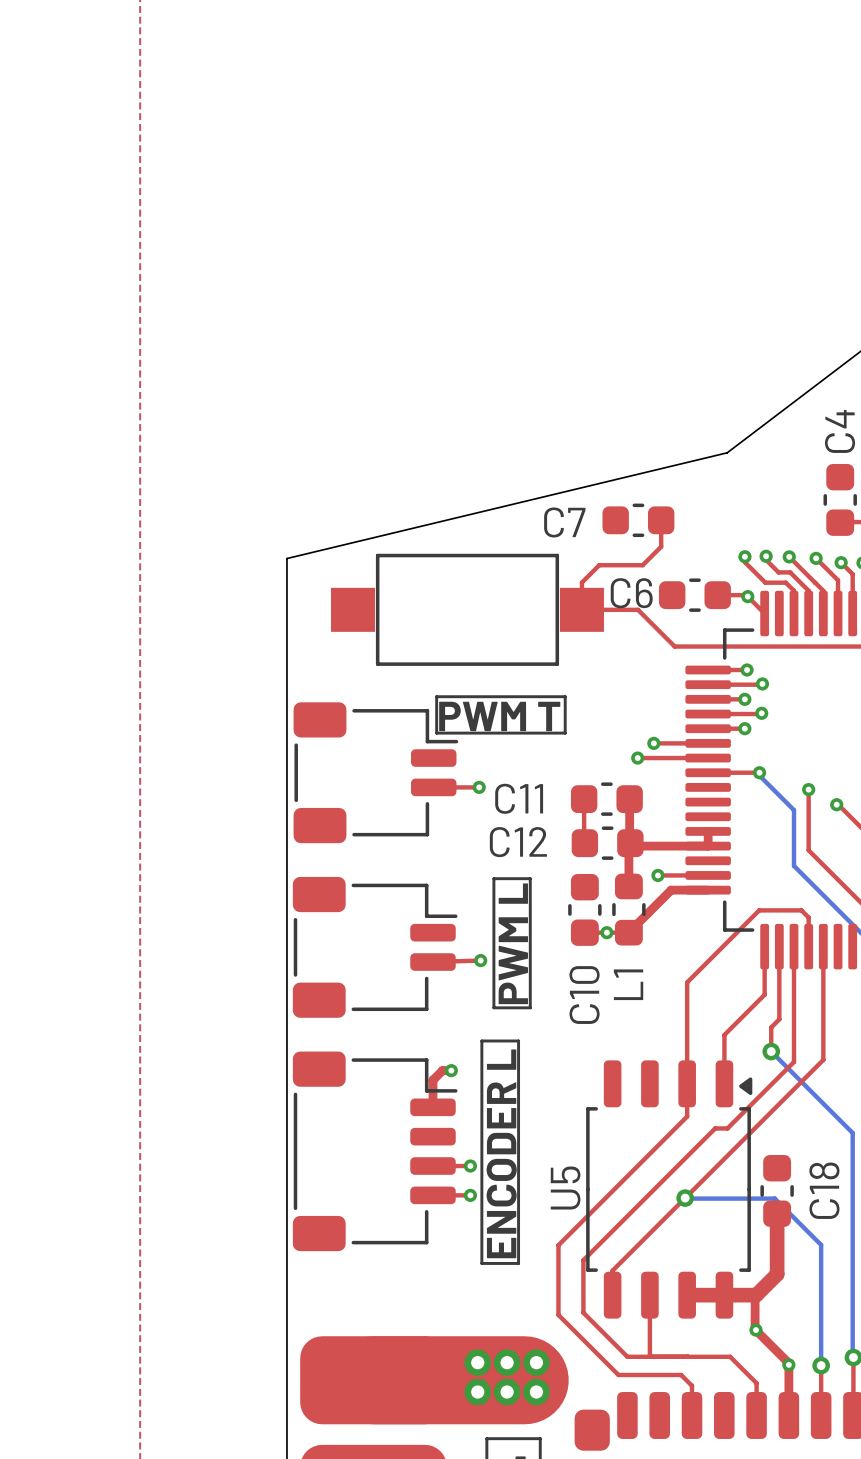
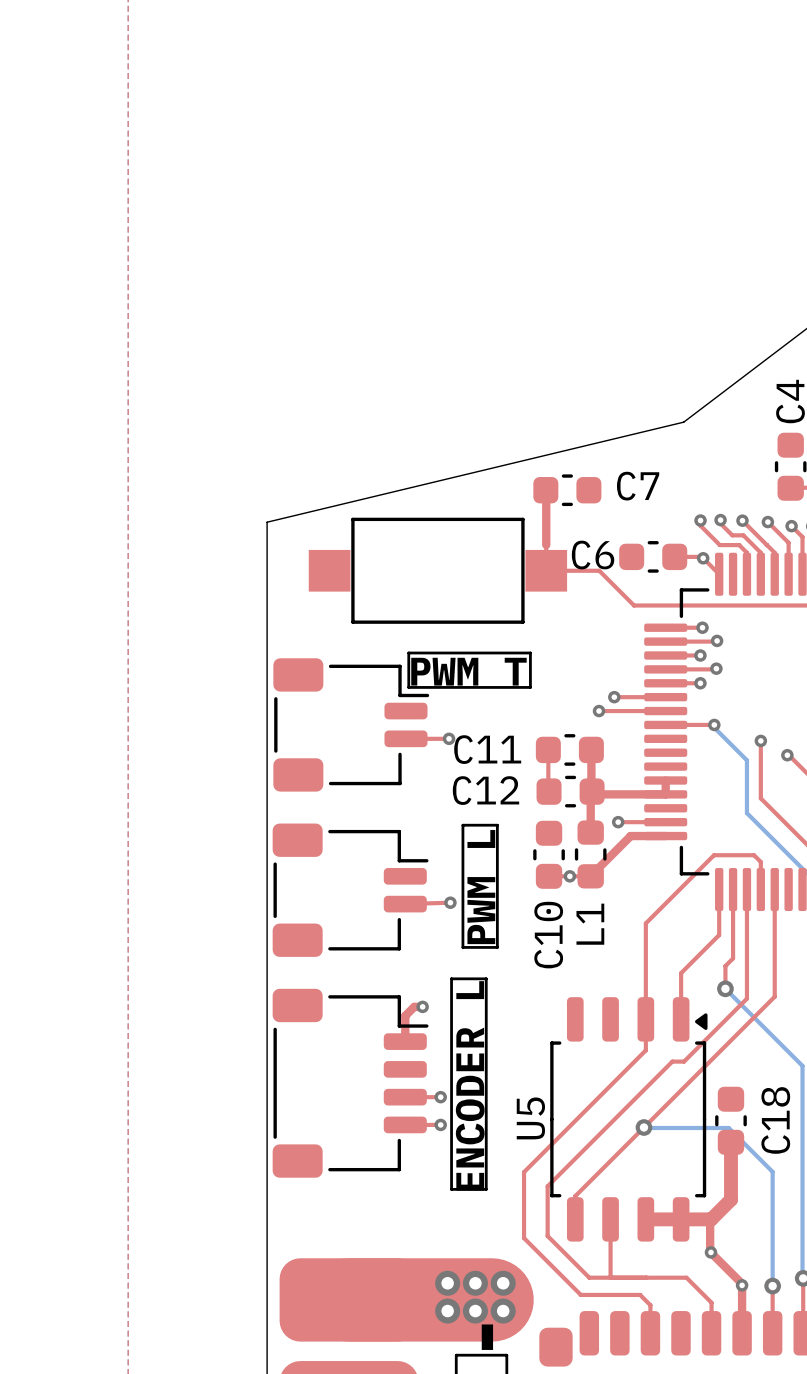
C7 position: (638, 520) -> (567, 490)
top track: (661, 520) (661, 546) (642, 565) (599, 565) (581, 582) -> (545, 490) (546, 544)
C7 name position: C7 (564, 522) -> C7 (638, 486)

